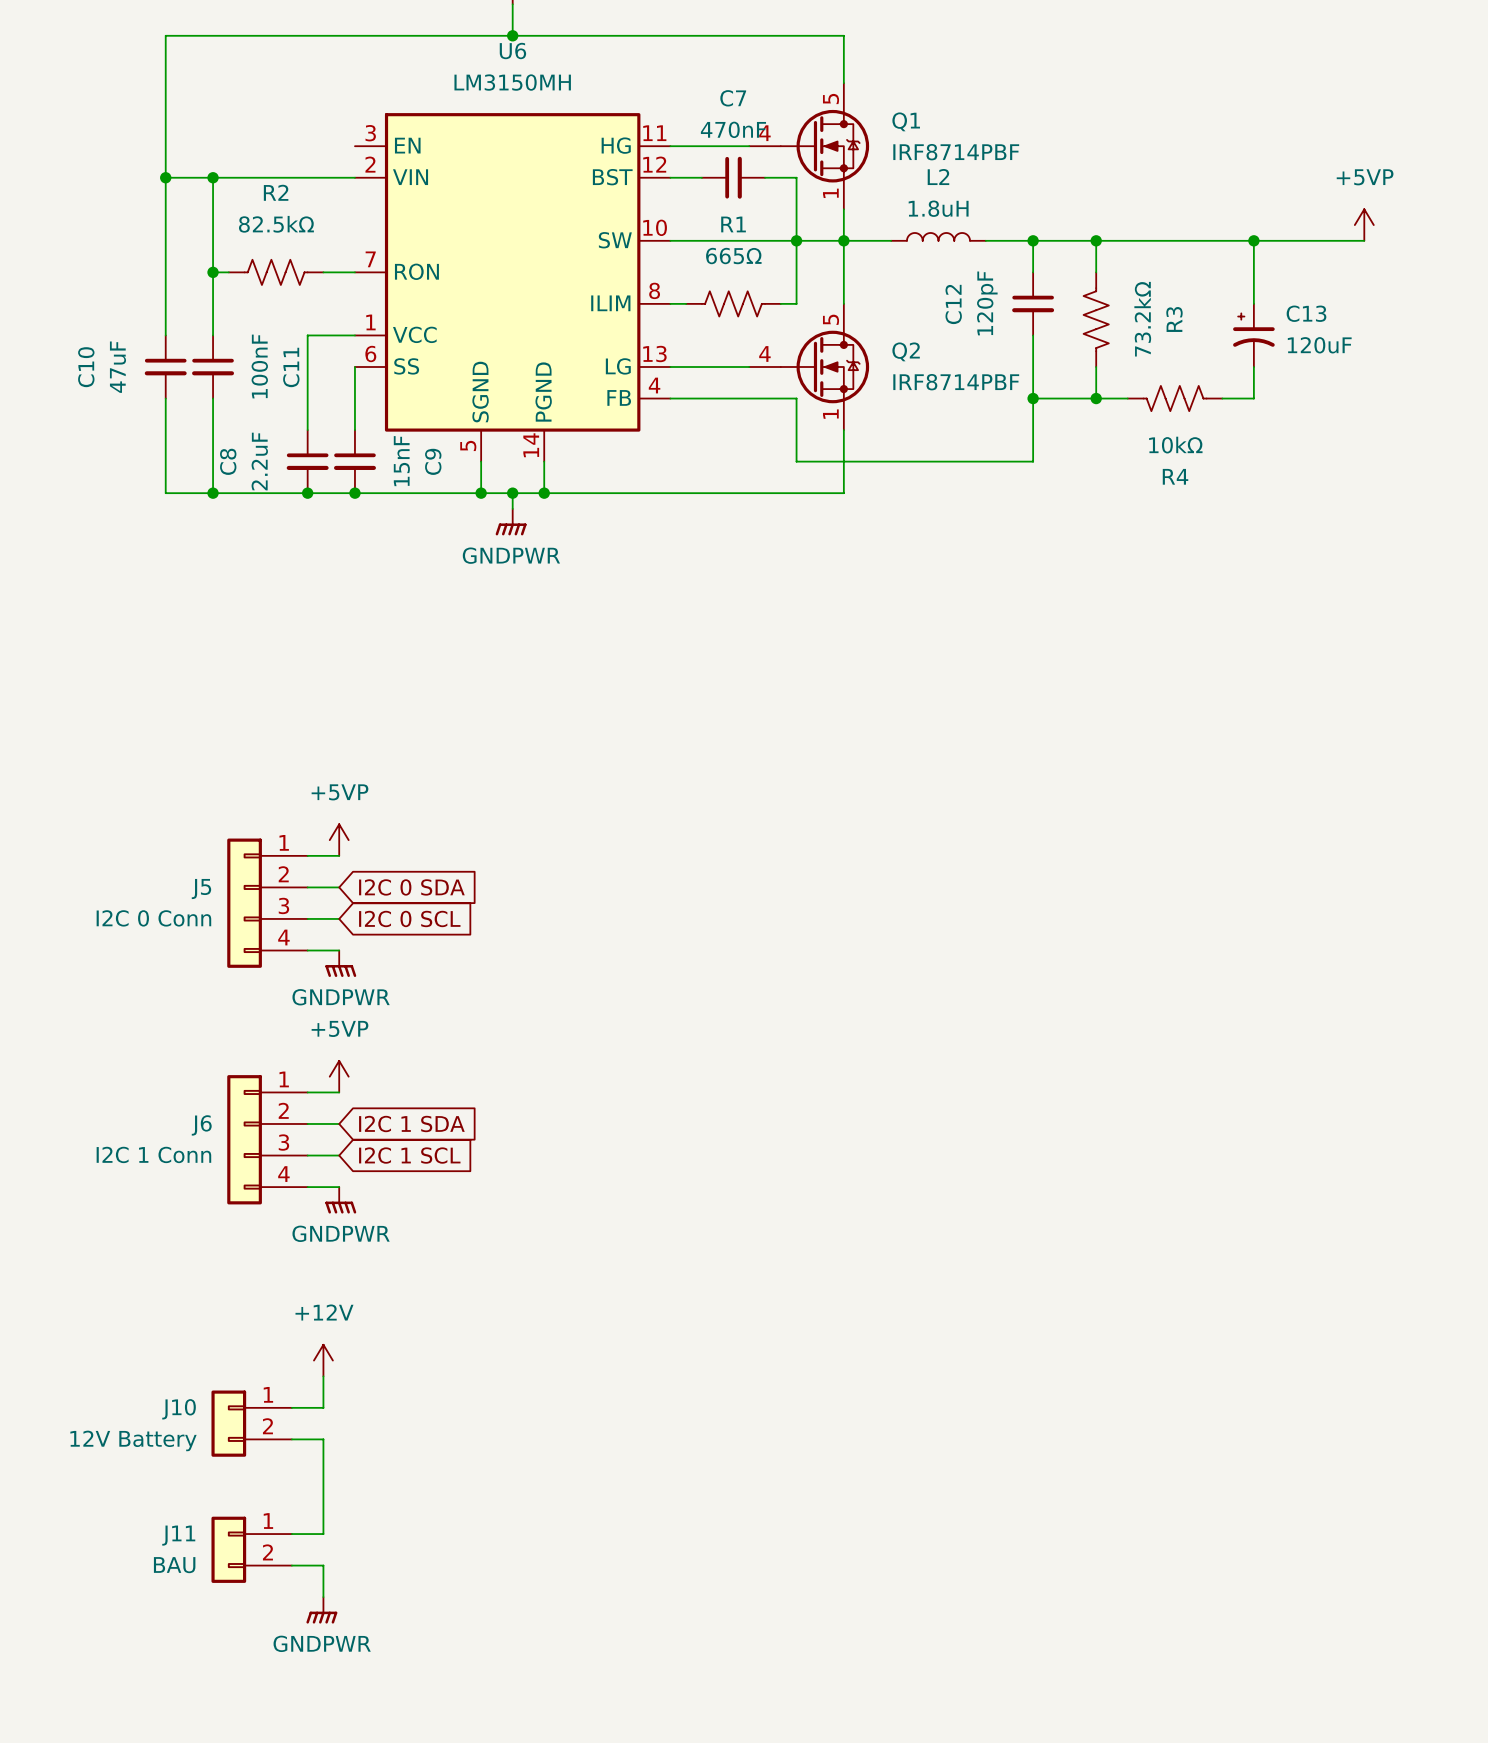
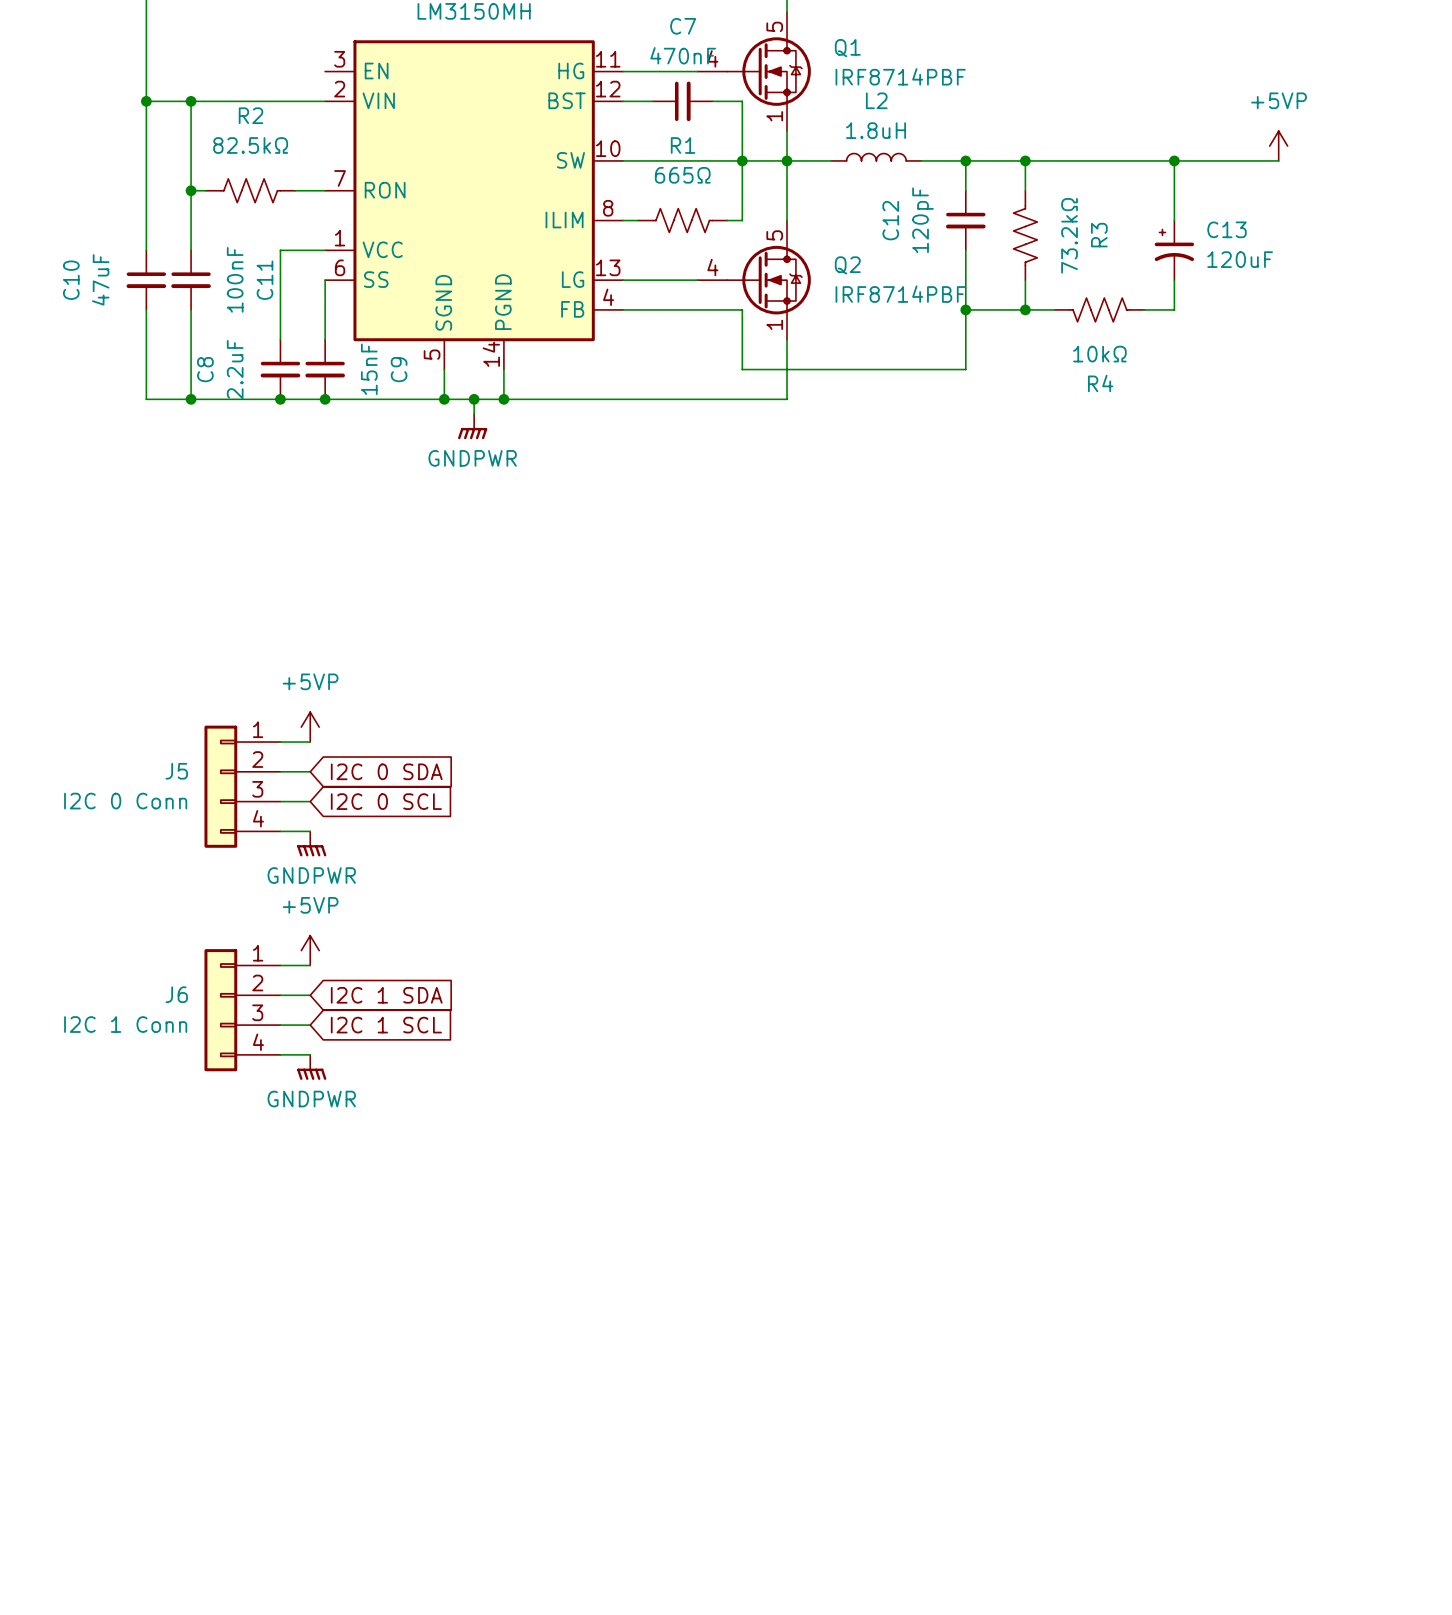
power symbol: +12V (323, 1360) -> none
wire: (323, 1376) (323, 1407) (291, 1407) -> none
J10: 12V Battery (251, 1423) -> none
wire: (291, 1439) (323, 1439) (323, 1534) (291, 1534) -> none
J11: BAU (251, 1549) -> none
wire: (291, 1565) (323, 1565) (323, 1597) -> none
power symbol: GNDPWR (321, 1610) -> none

